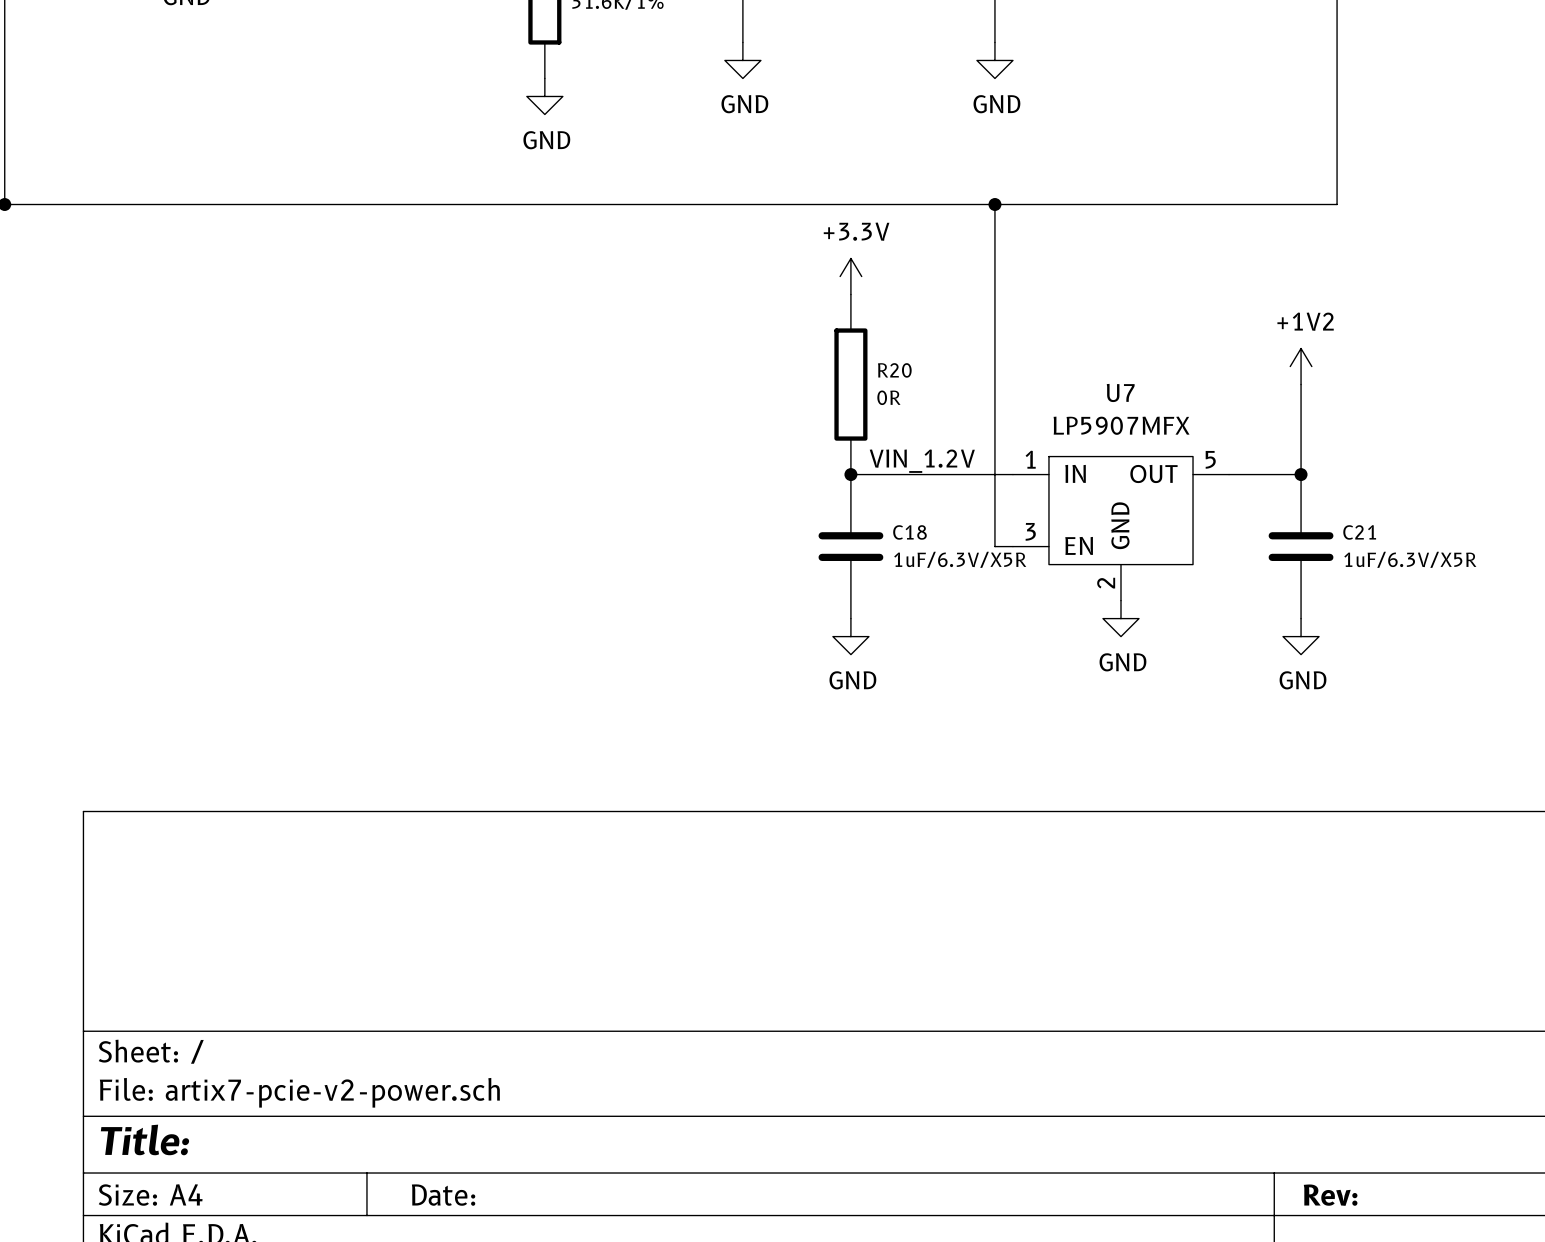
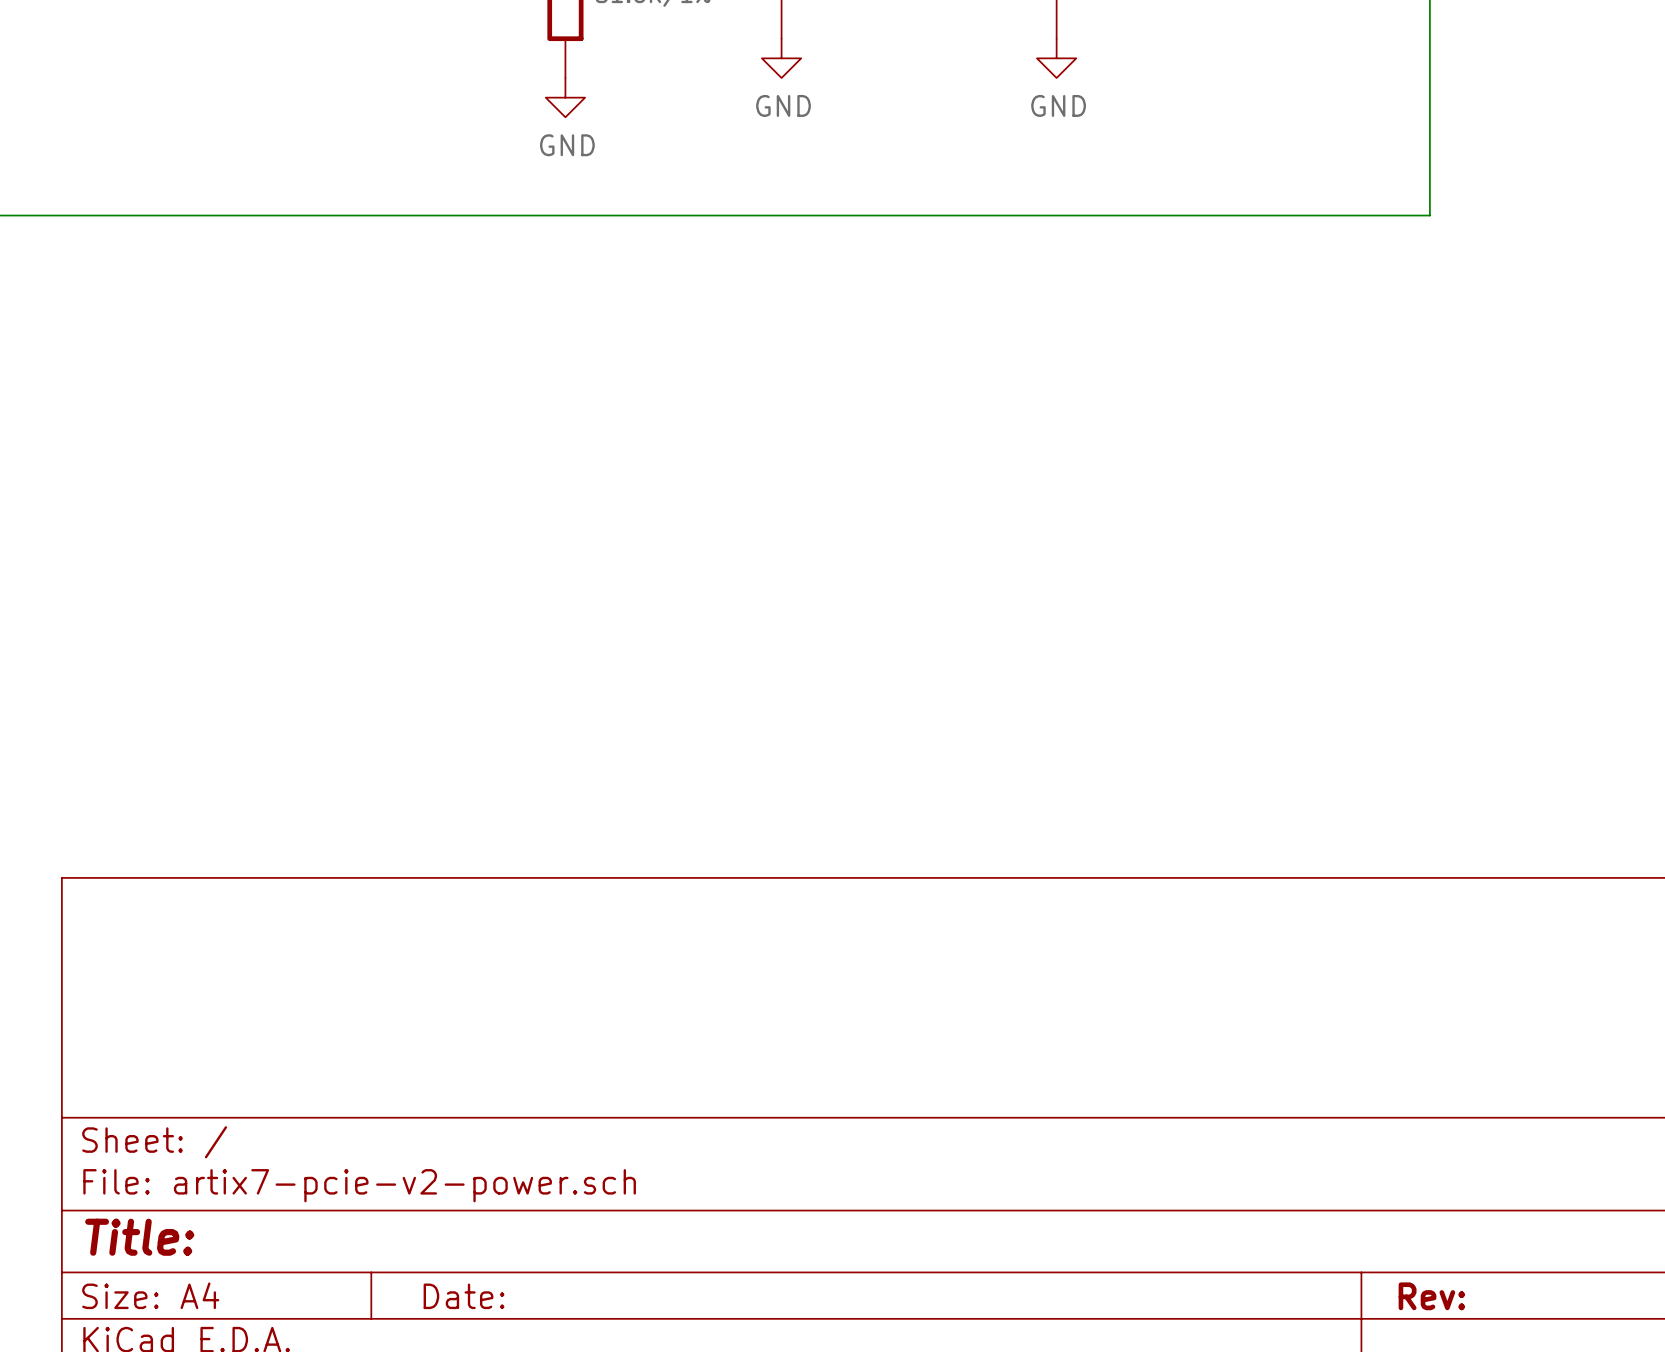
wire: (994, 204) (994, 546) (1012, 546) -> none
junction: (994, 204) -> none
power symbol: +3.3V (850, 276) -> none
power symbol: +1V2 (1301, 366) -> none
R20: 0R (850, 384) -> none
wire: (1301, 384) (1301, 474) (1229, 474) -> none
label: VIN_1.2V (922, 461) -> none
wire: (850, 474) (1012, 474) -> none
junction: (850, 474) -> none
junction: (1301, 474) -> none
U7: LP5907MFX (1120, 528) -> none
C18: 1uF/6.3V/X5R (850, 546) -> none
C21: 1uF/6.3V/X5R (1301, 546) -> none
power symbol: GND (1120, 618) -> none
power symbol: GND (850, 636) -> none
power symbol: GND (1301, 636) -> none

